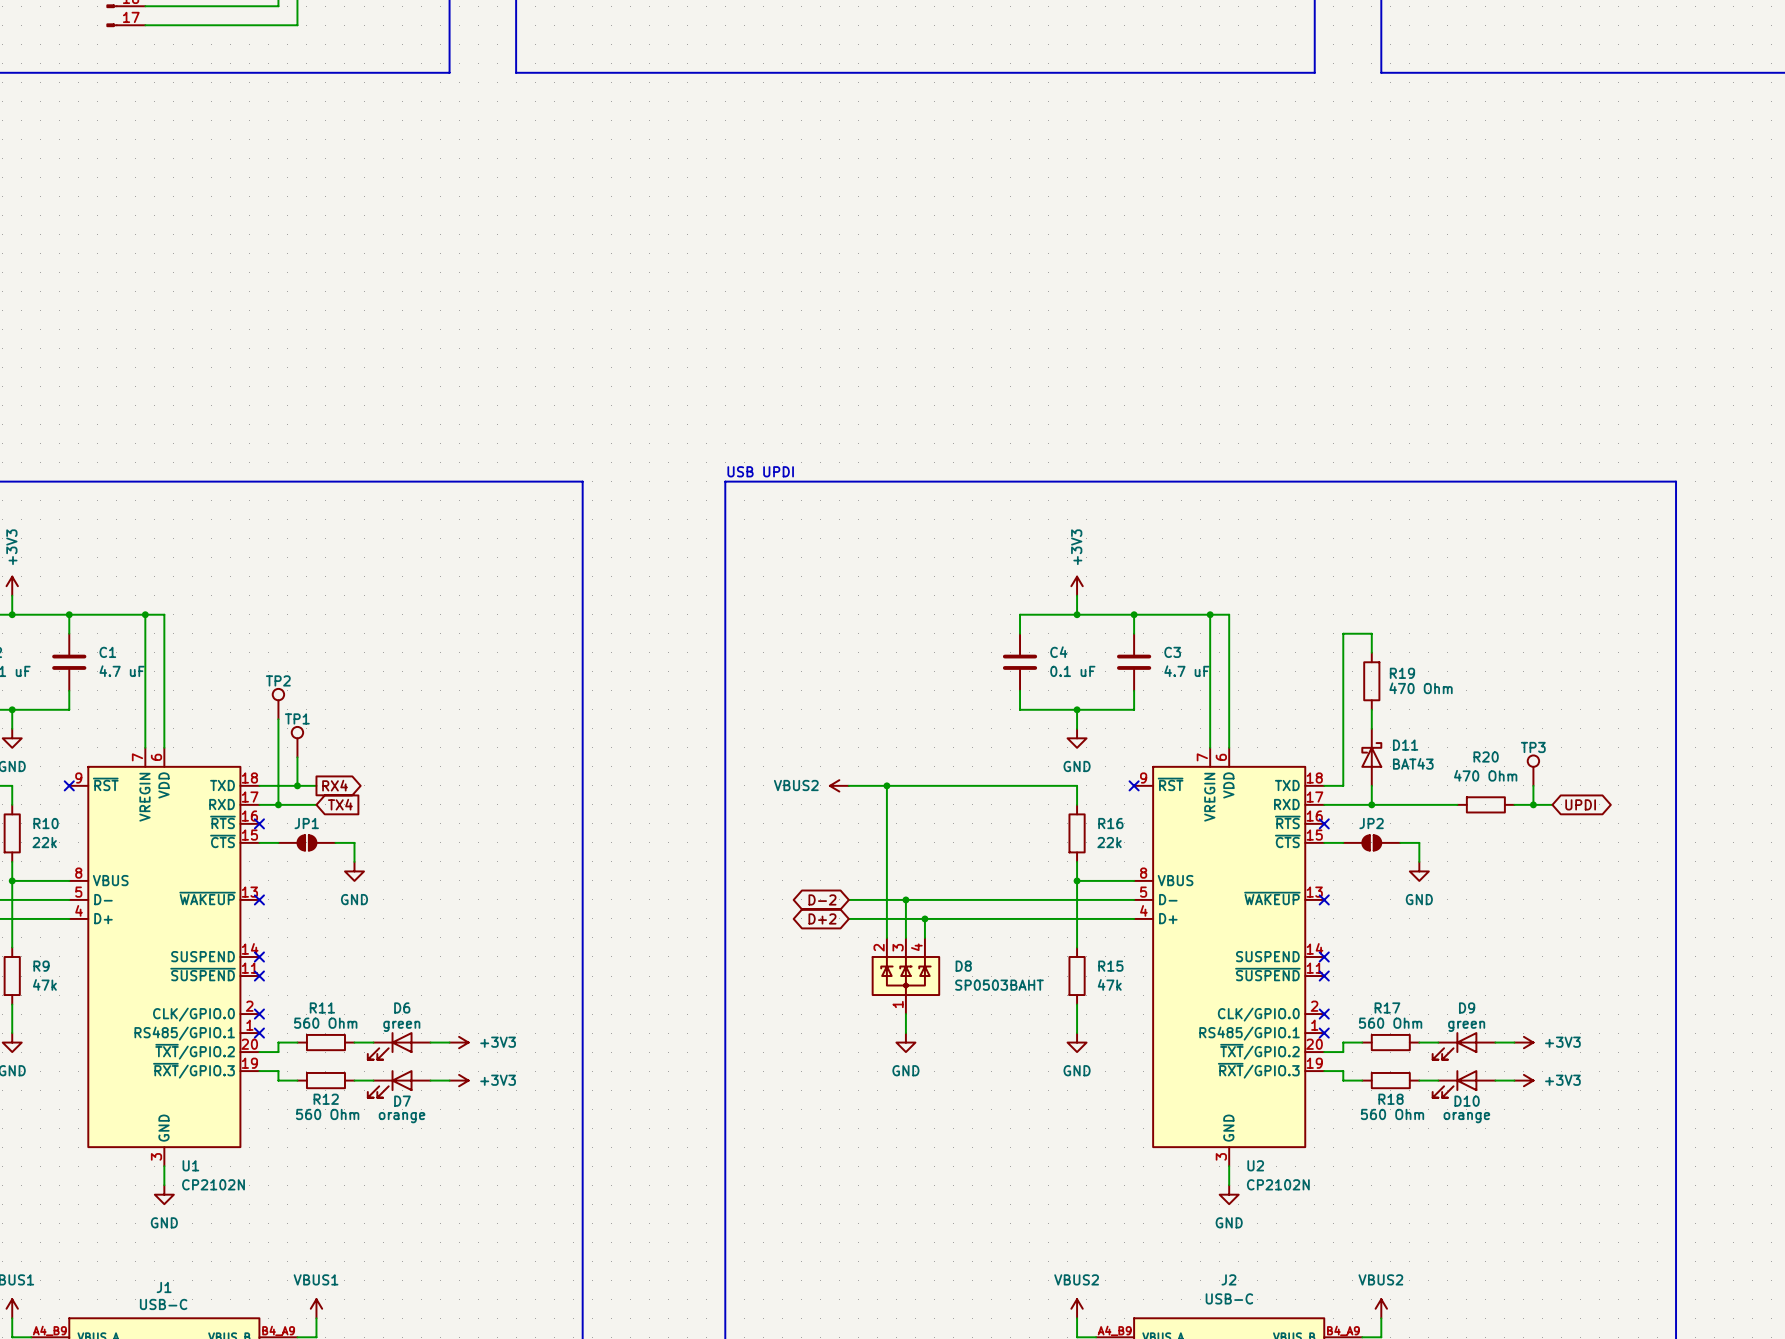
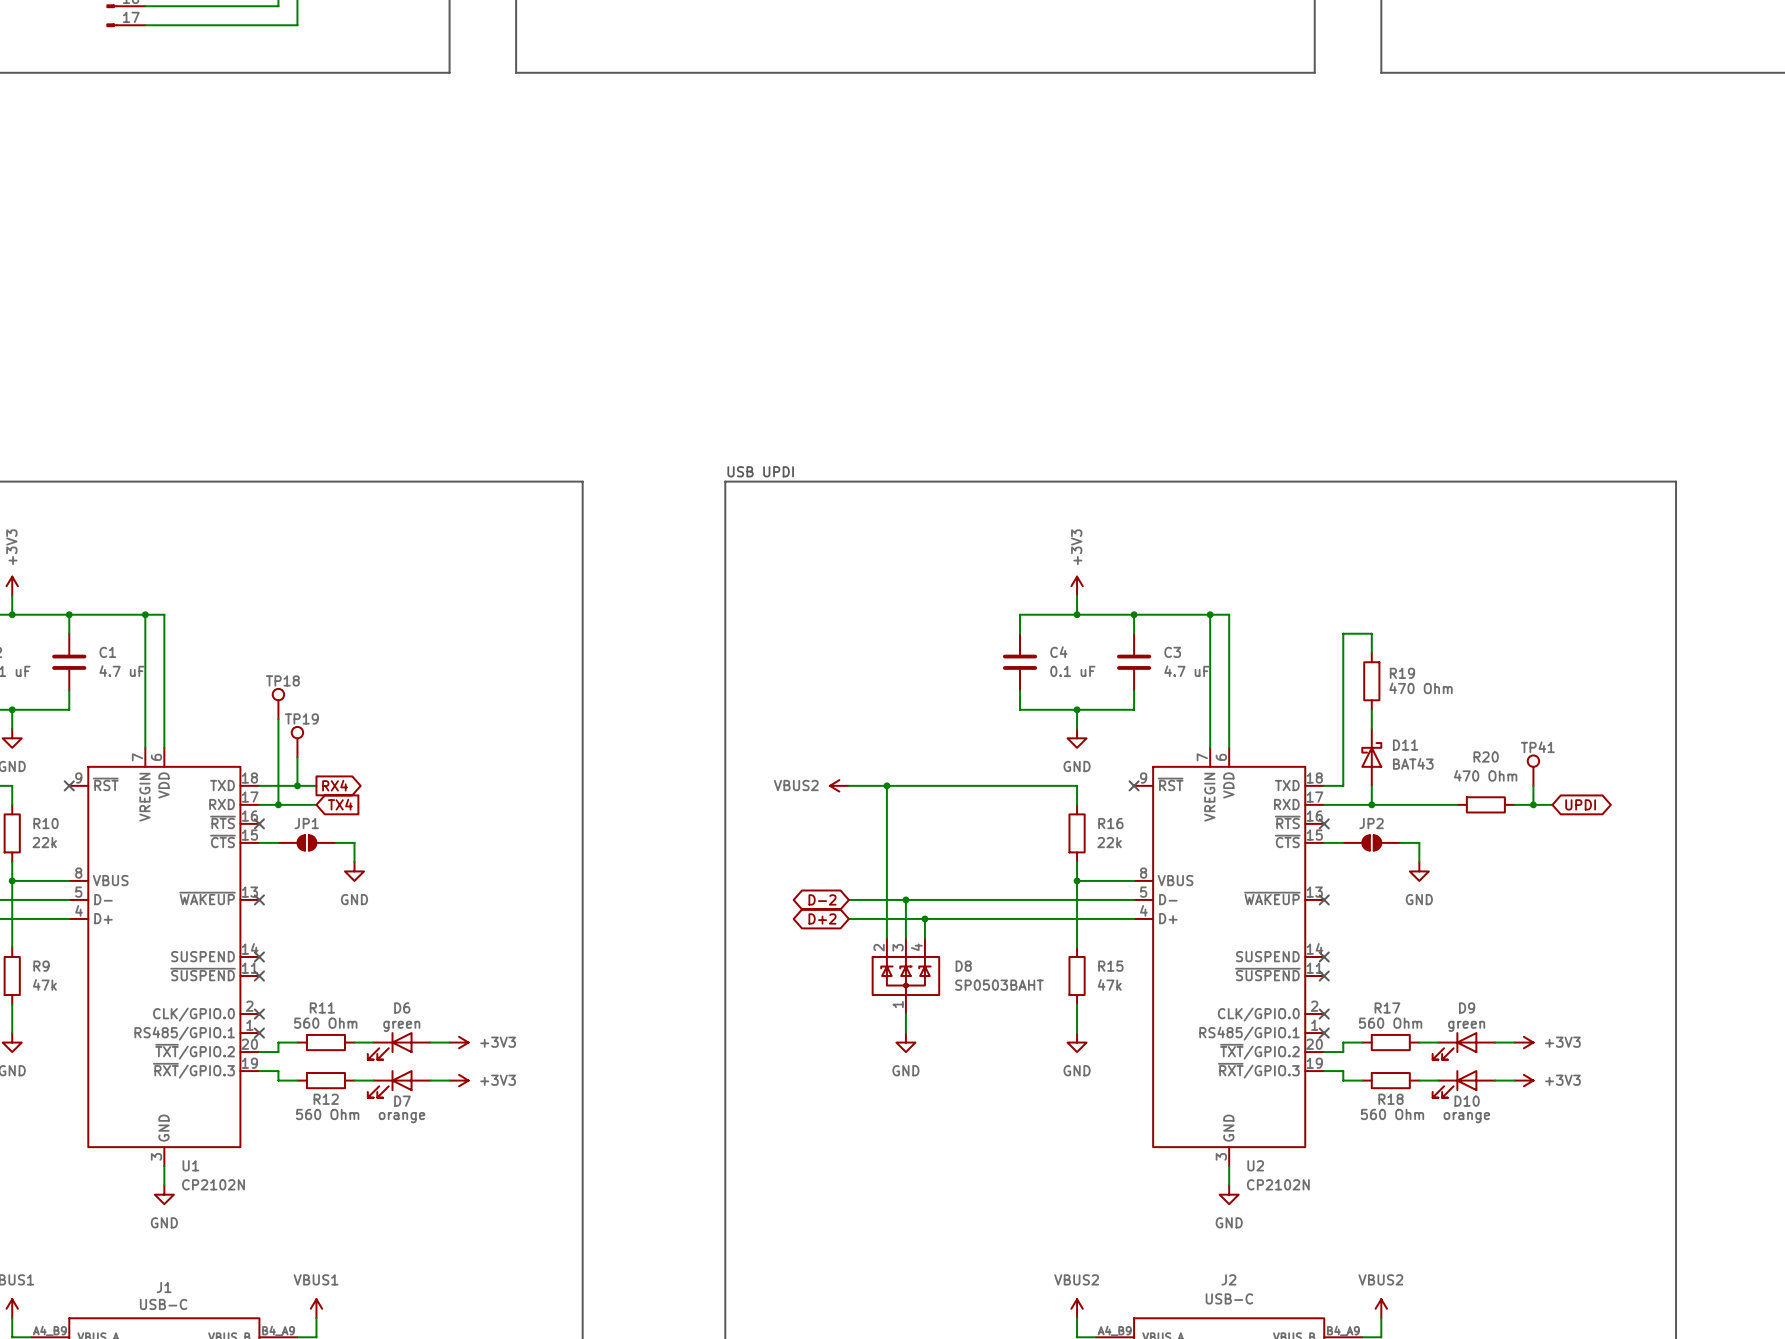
TP2 name: TP2 (278, 680) -> TP18 (282, 680)
TP1 name: TP1 (297, 718) -> TP19 (301, 718)
TP3 name: TP3 (1533, 747) -> TP41 (1537, 747)

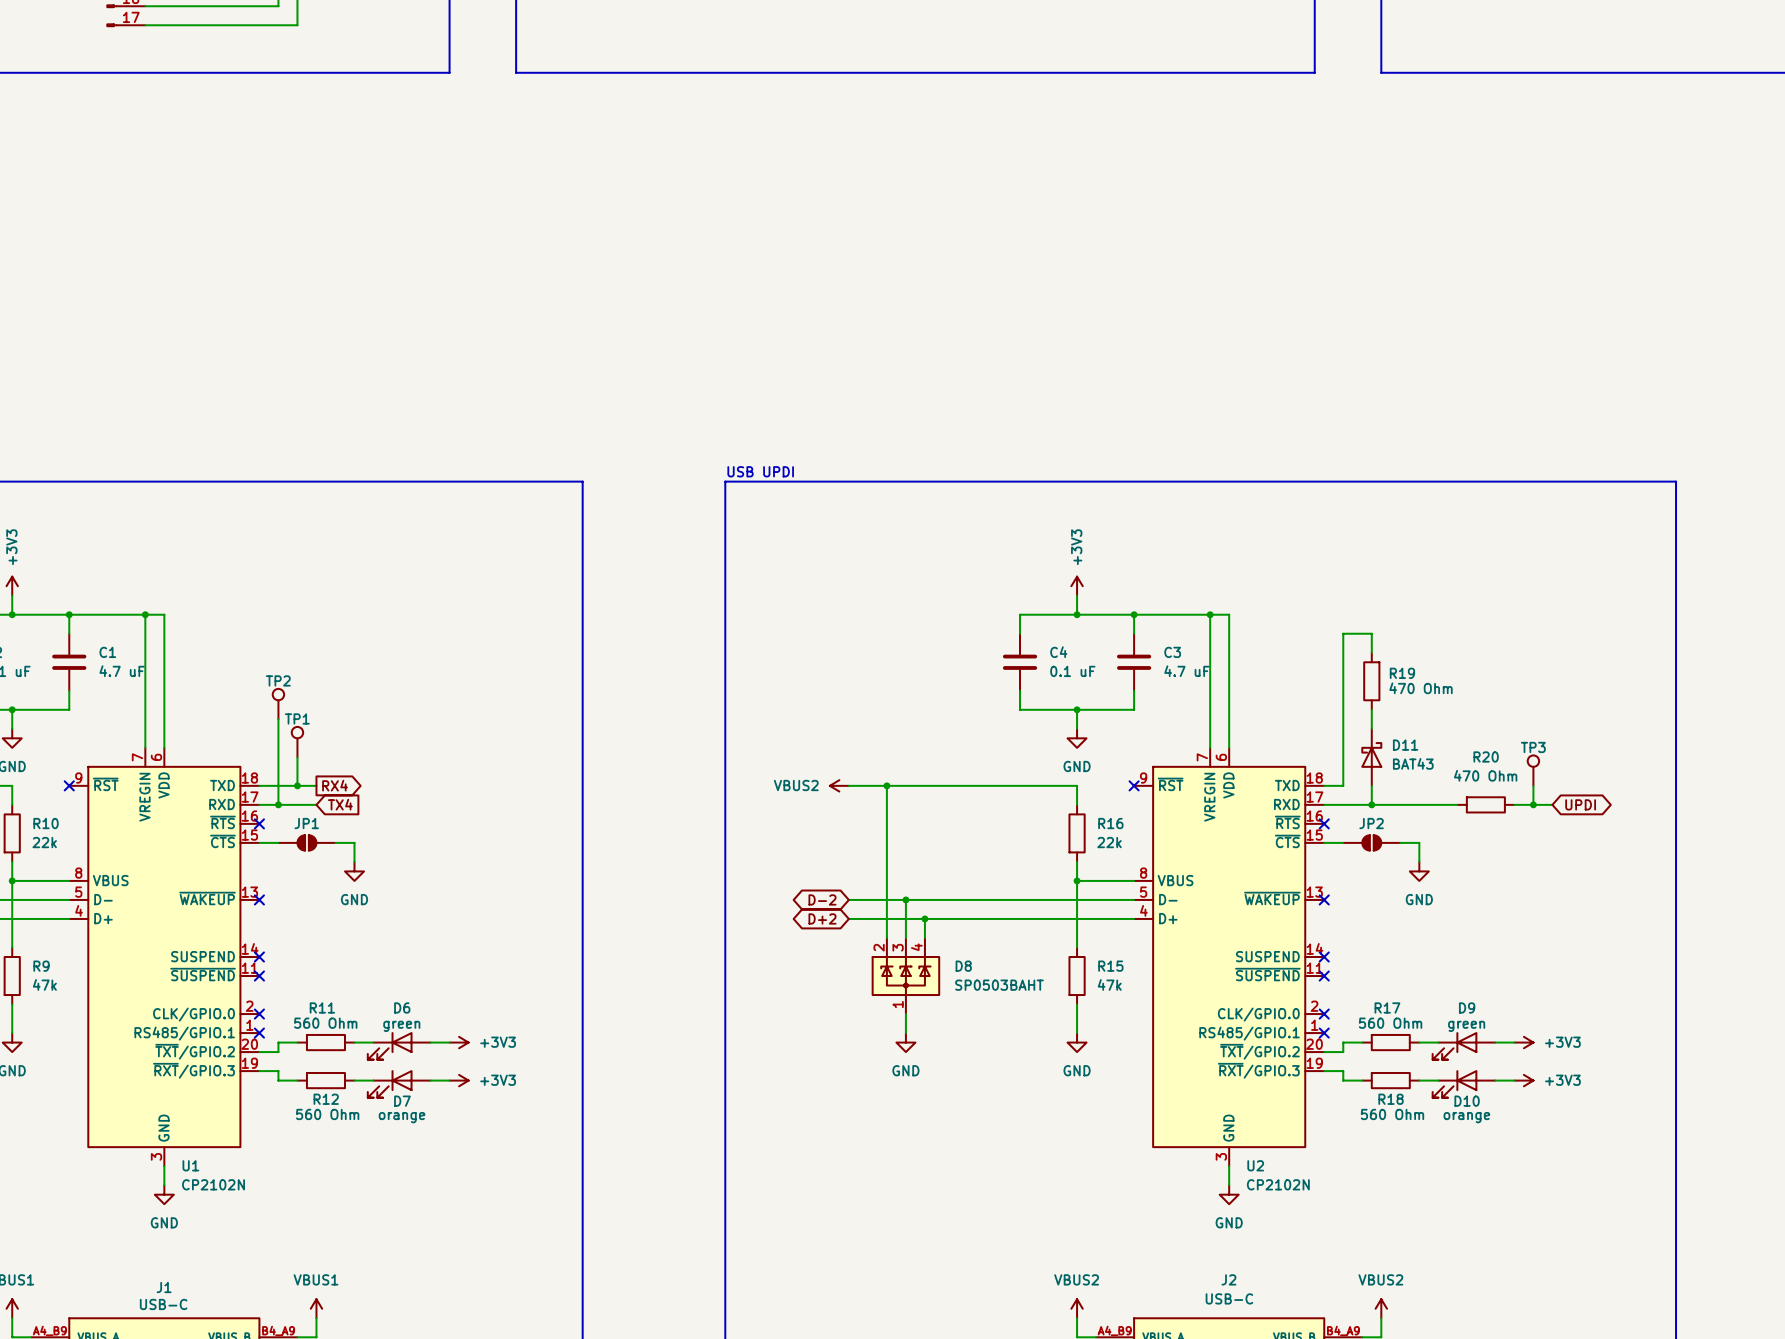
TP18 name: TP18 (282, 680) -> TP2 (278, 680)
TP19 name: TP19 (301, 718) -> TP1 (297, 718)
TP41 name: TP41 (1537, 747) -> TP3 (1533, 747)

